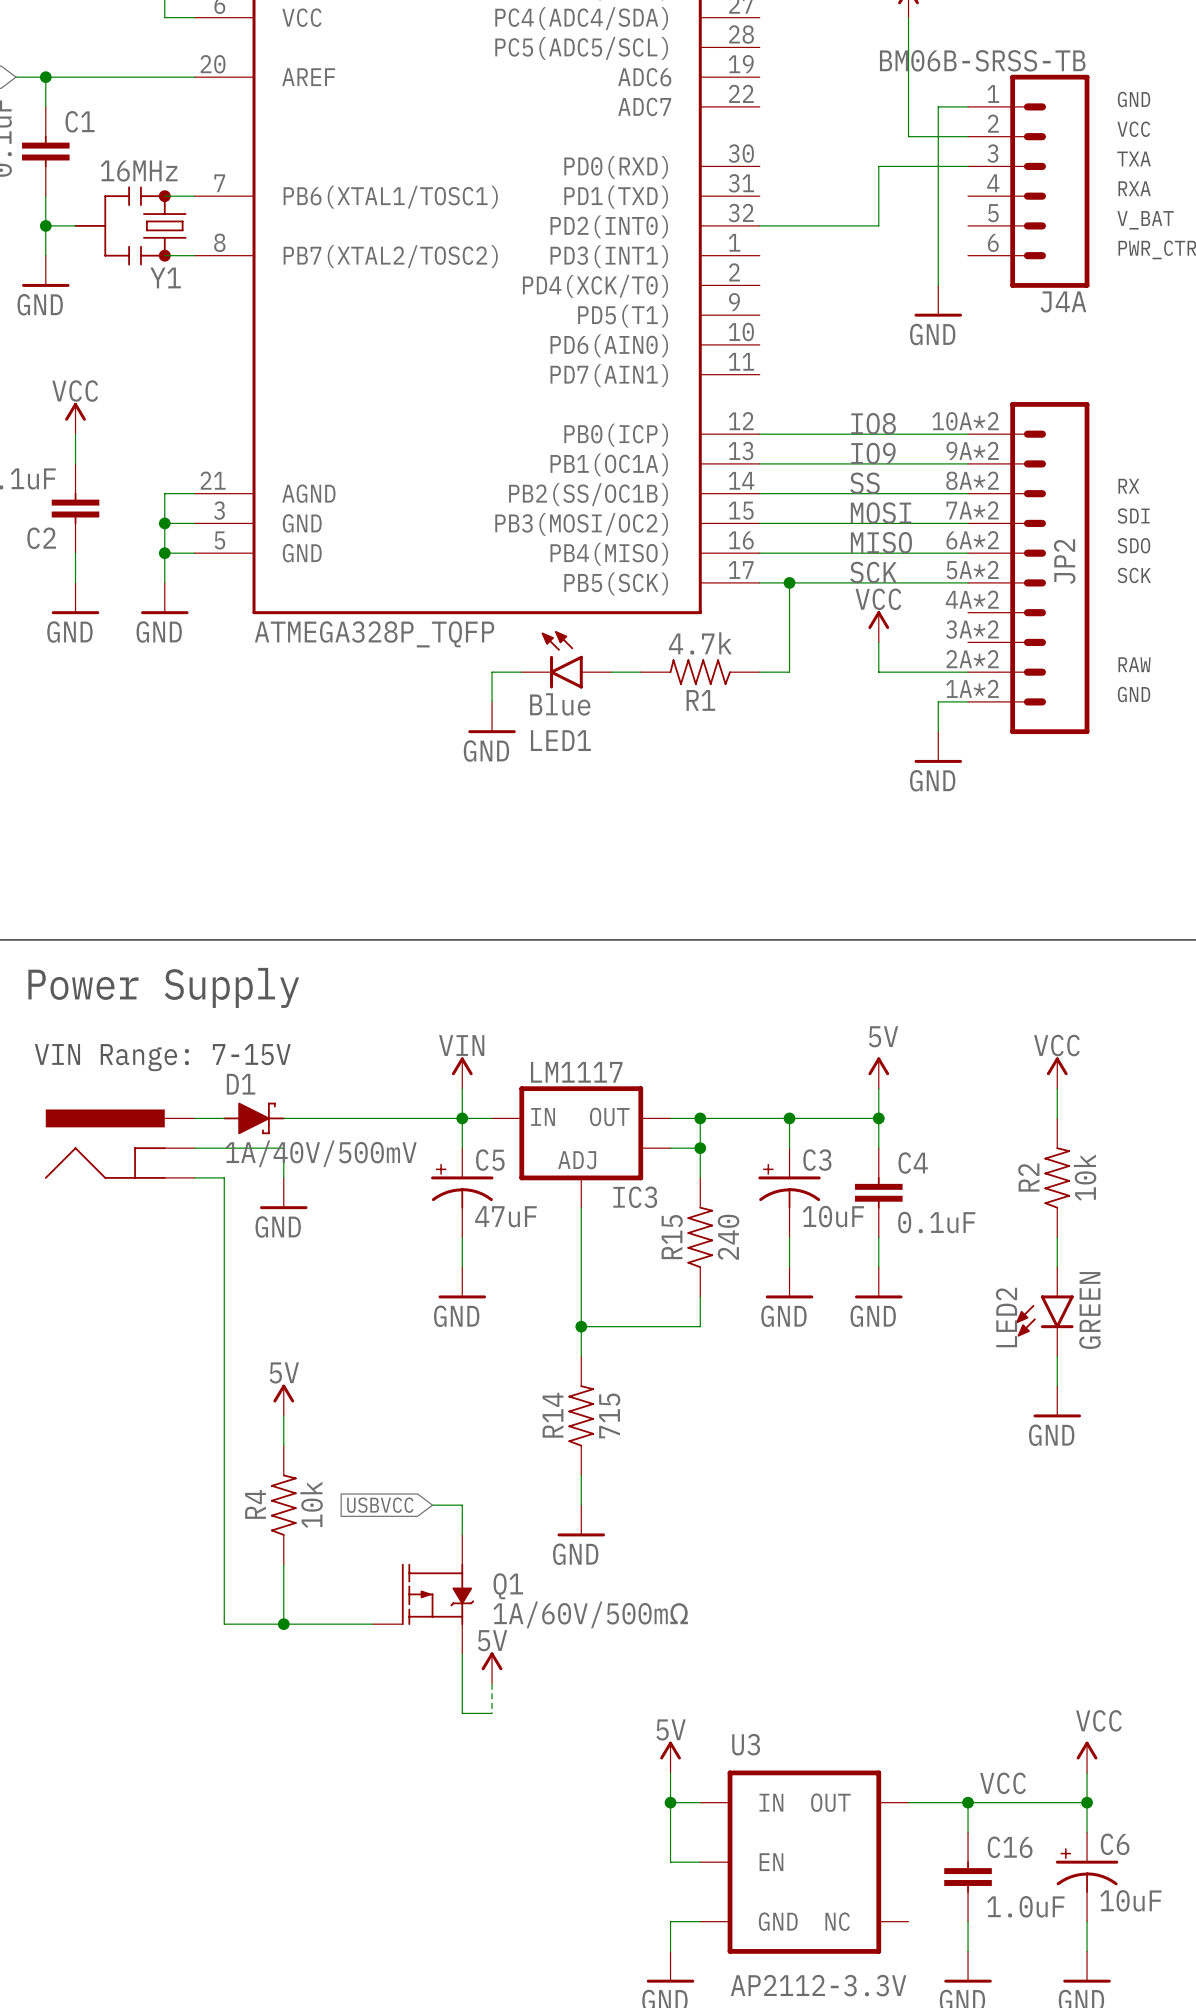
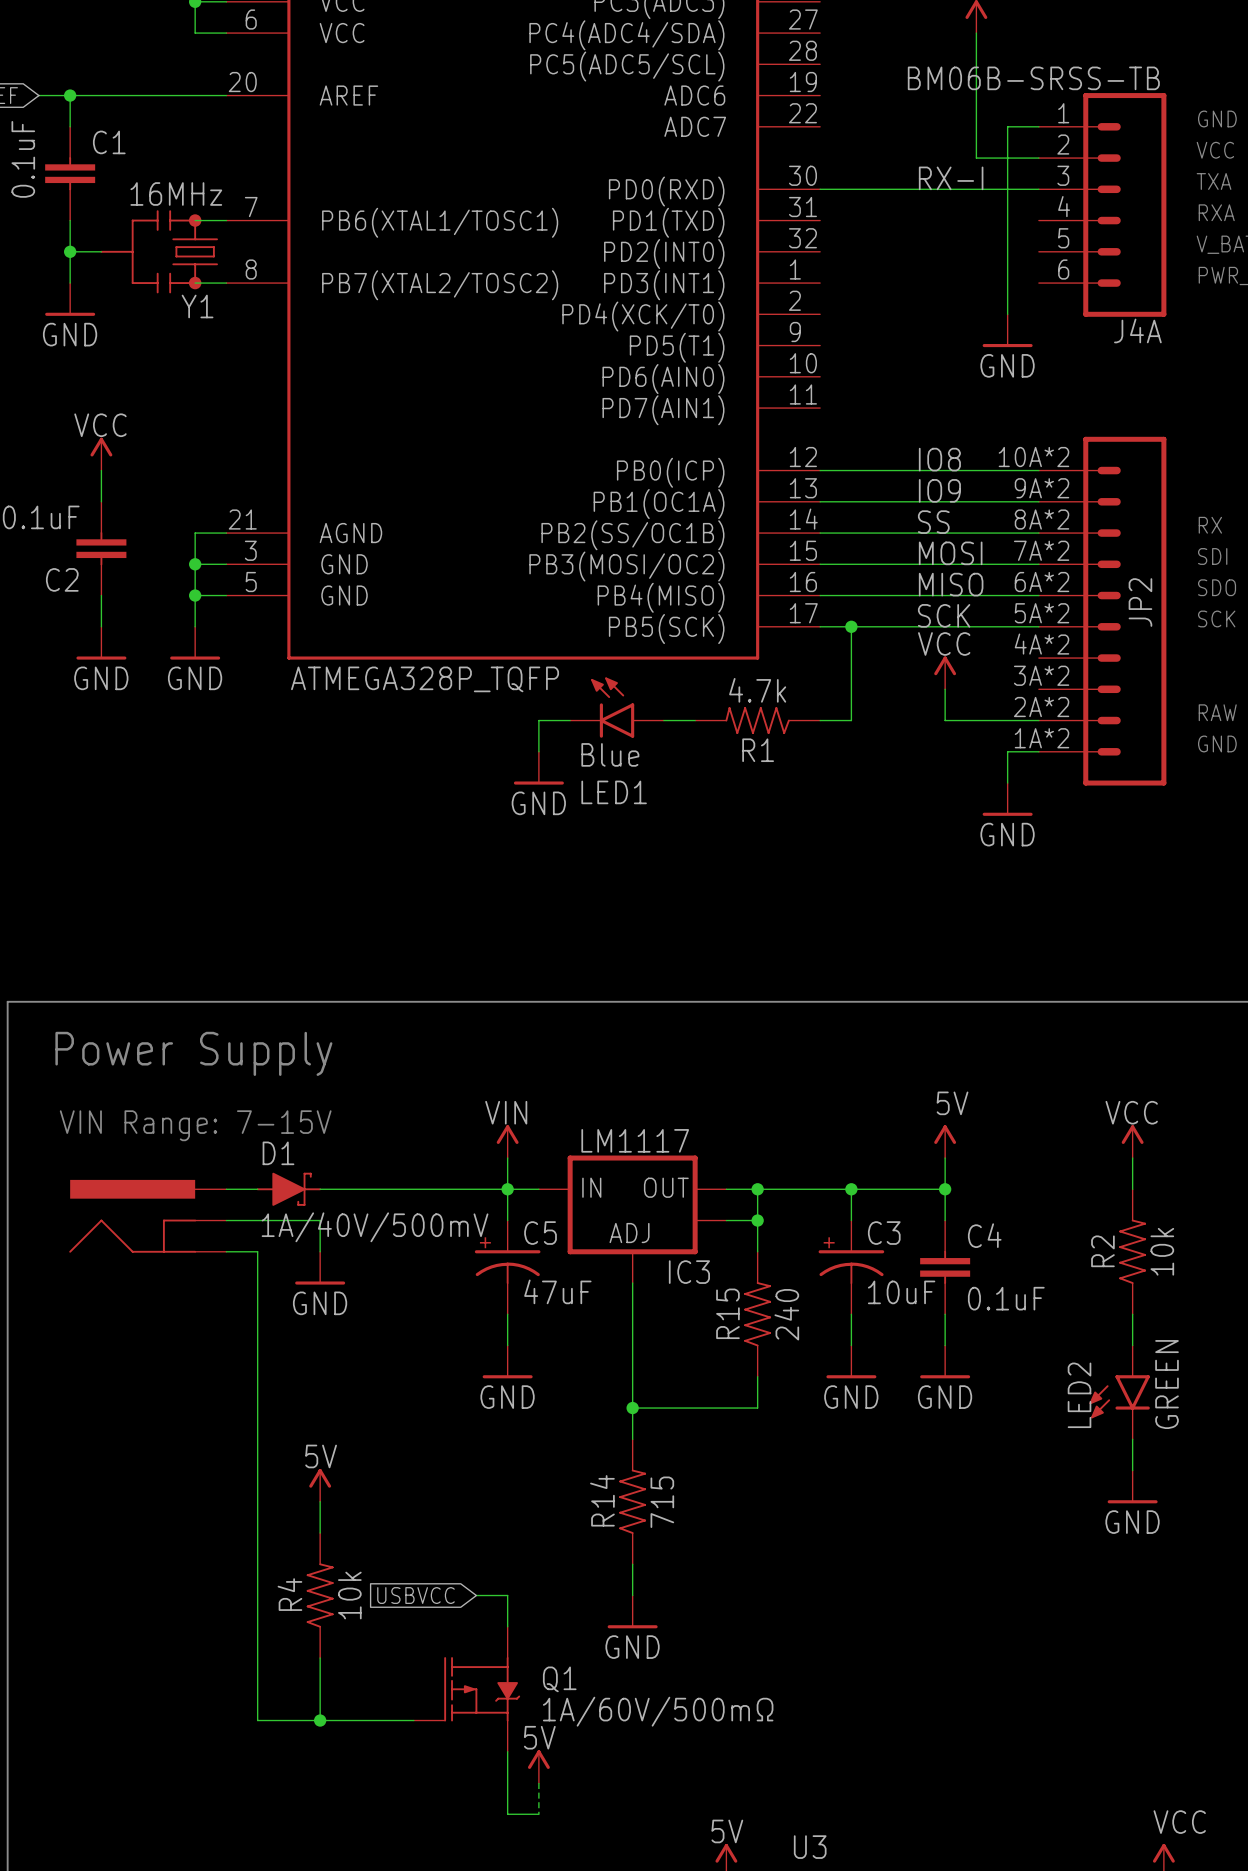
label: none -> RX-I (951, 178)
wire: (878, 166) (878, 225) (759, 225) -> (945, 189) (820, 189)

